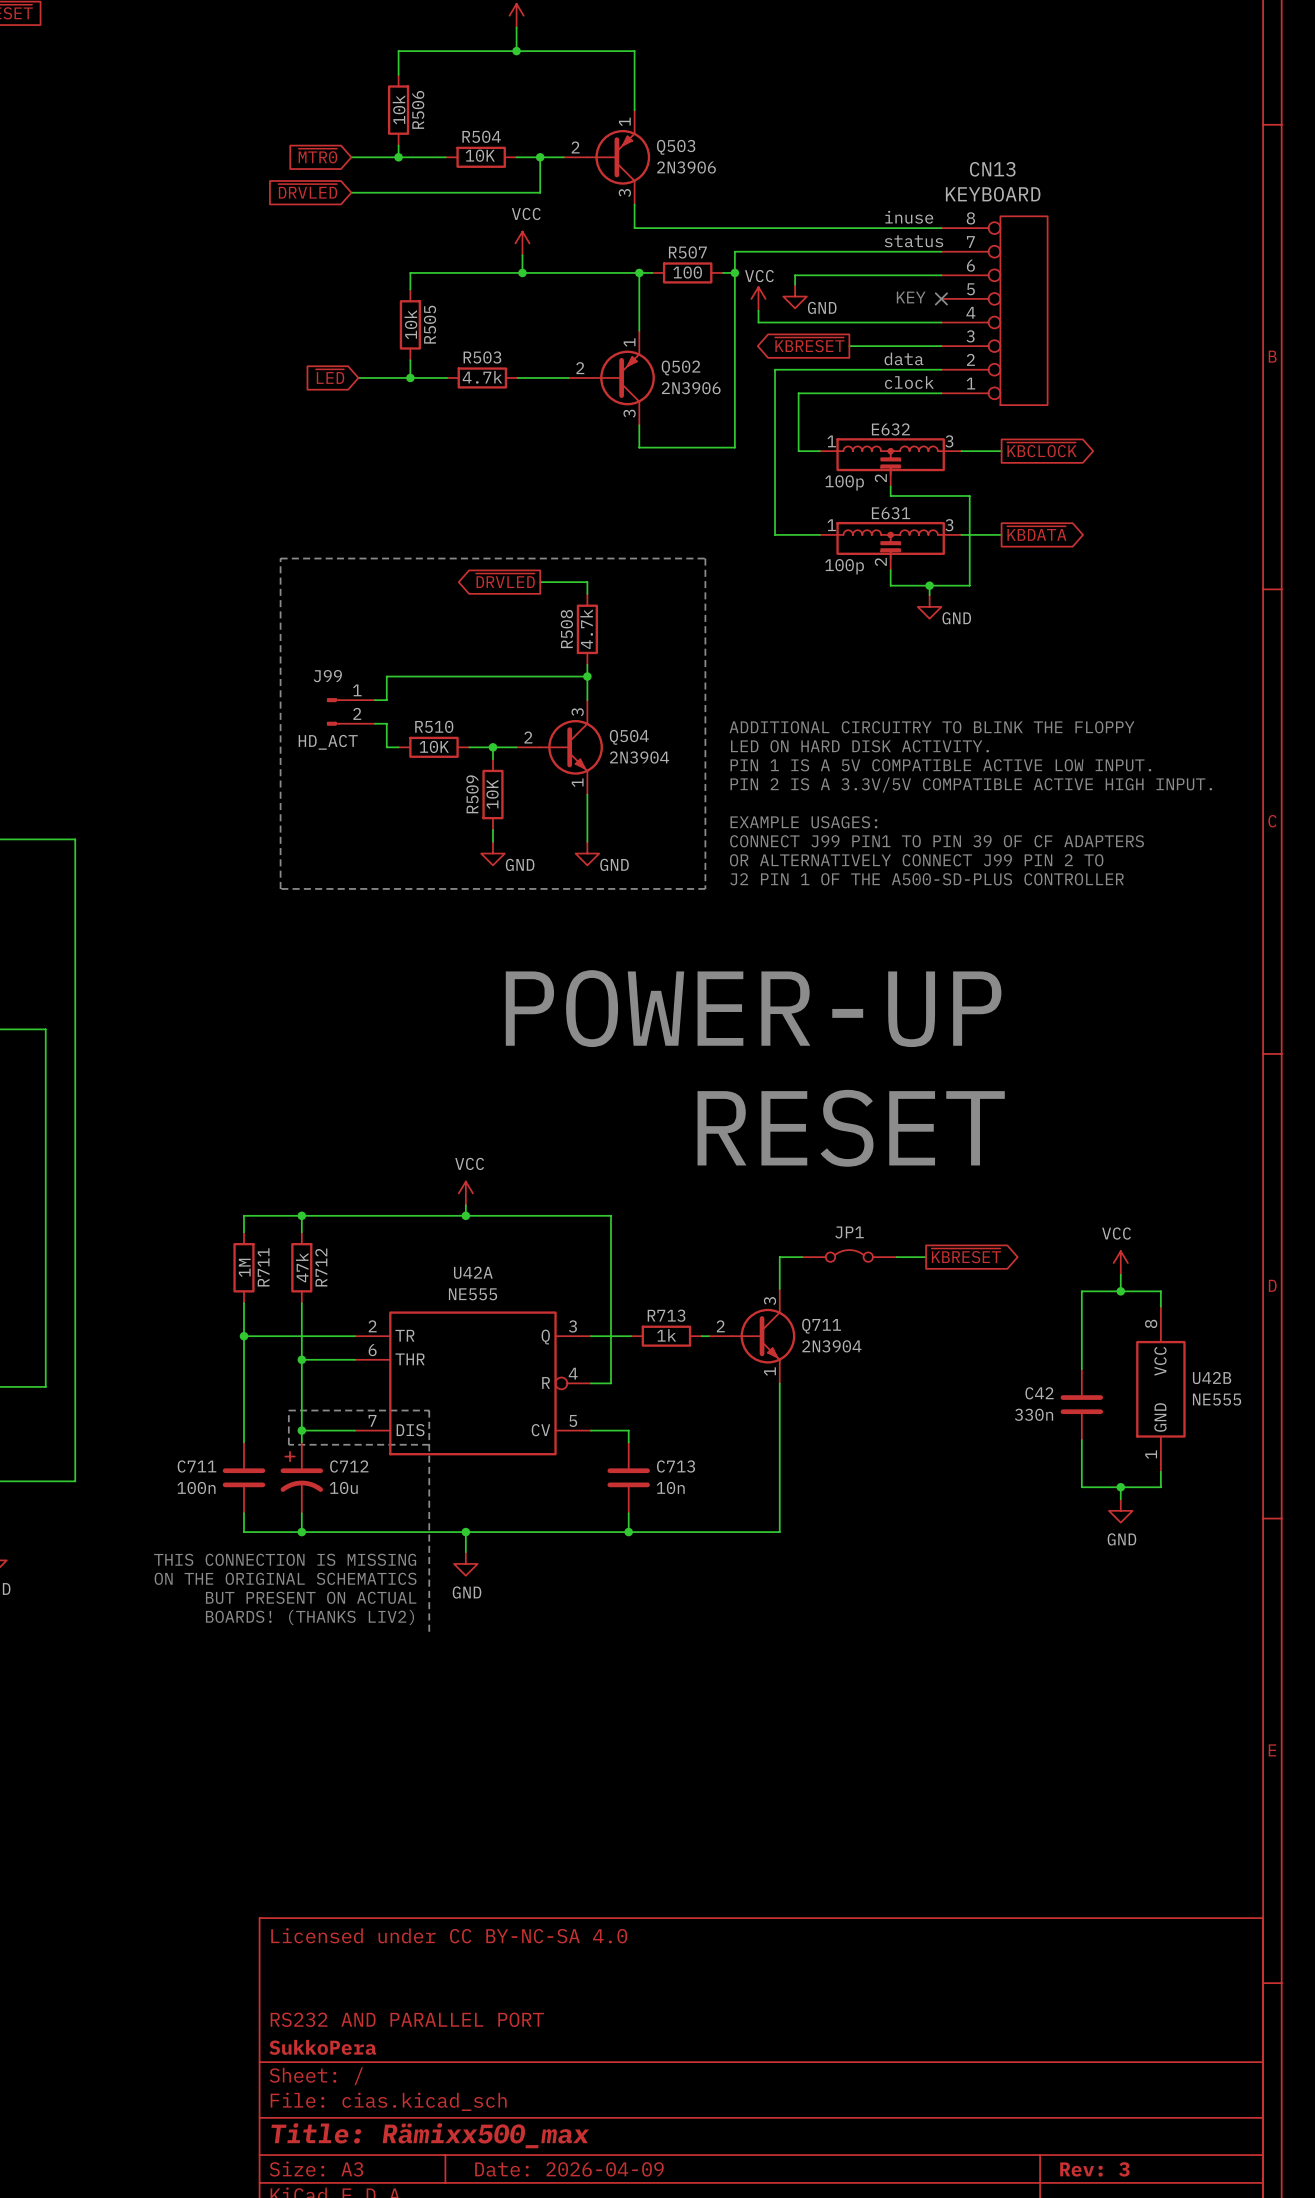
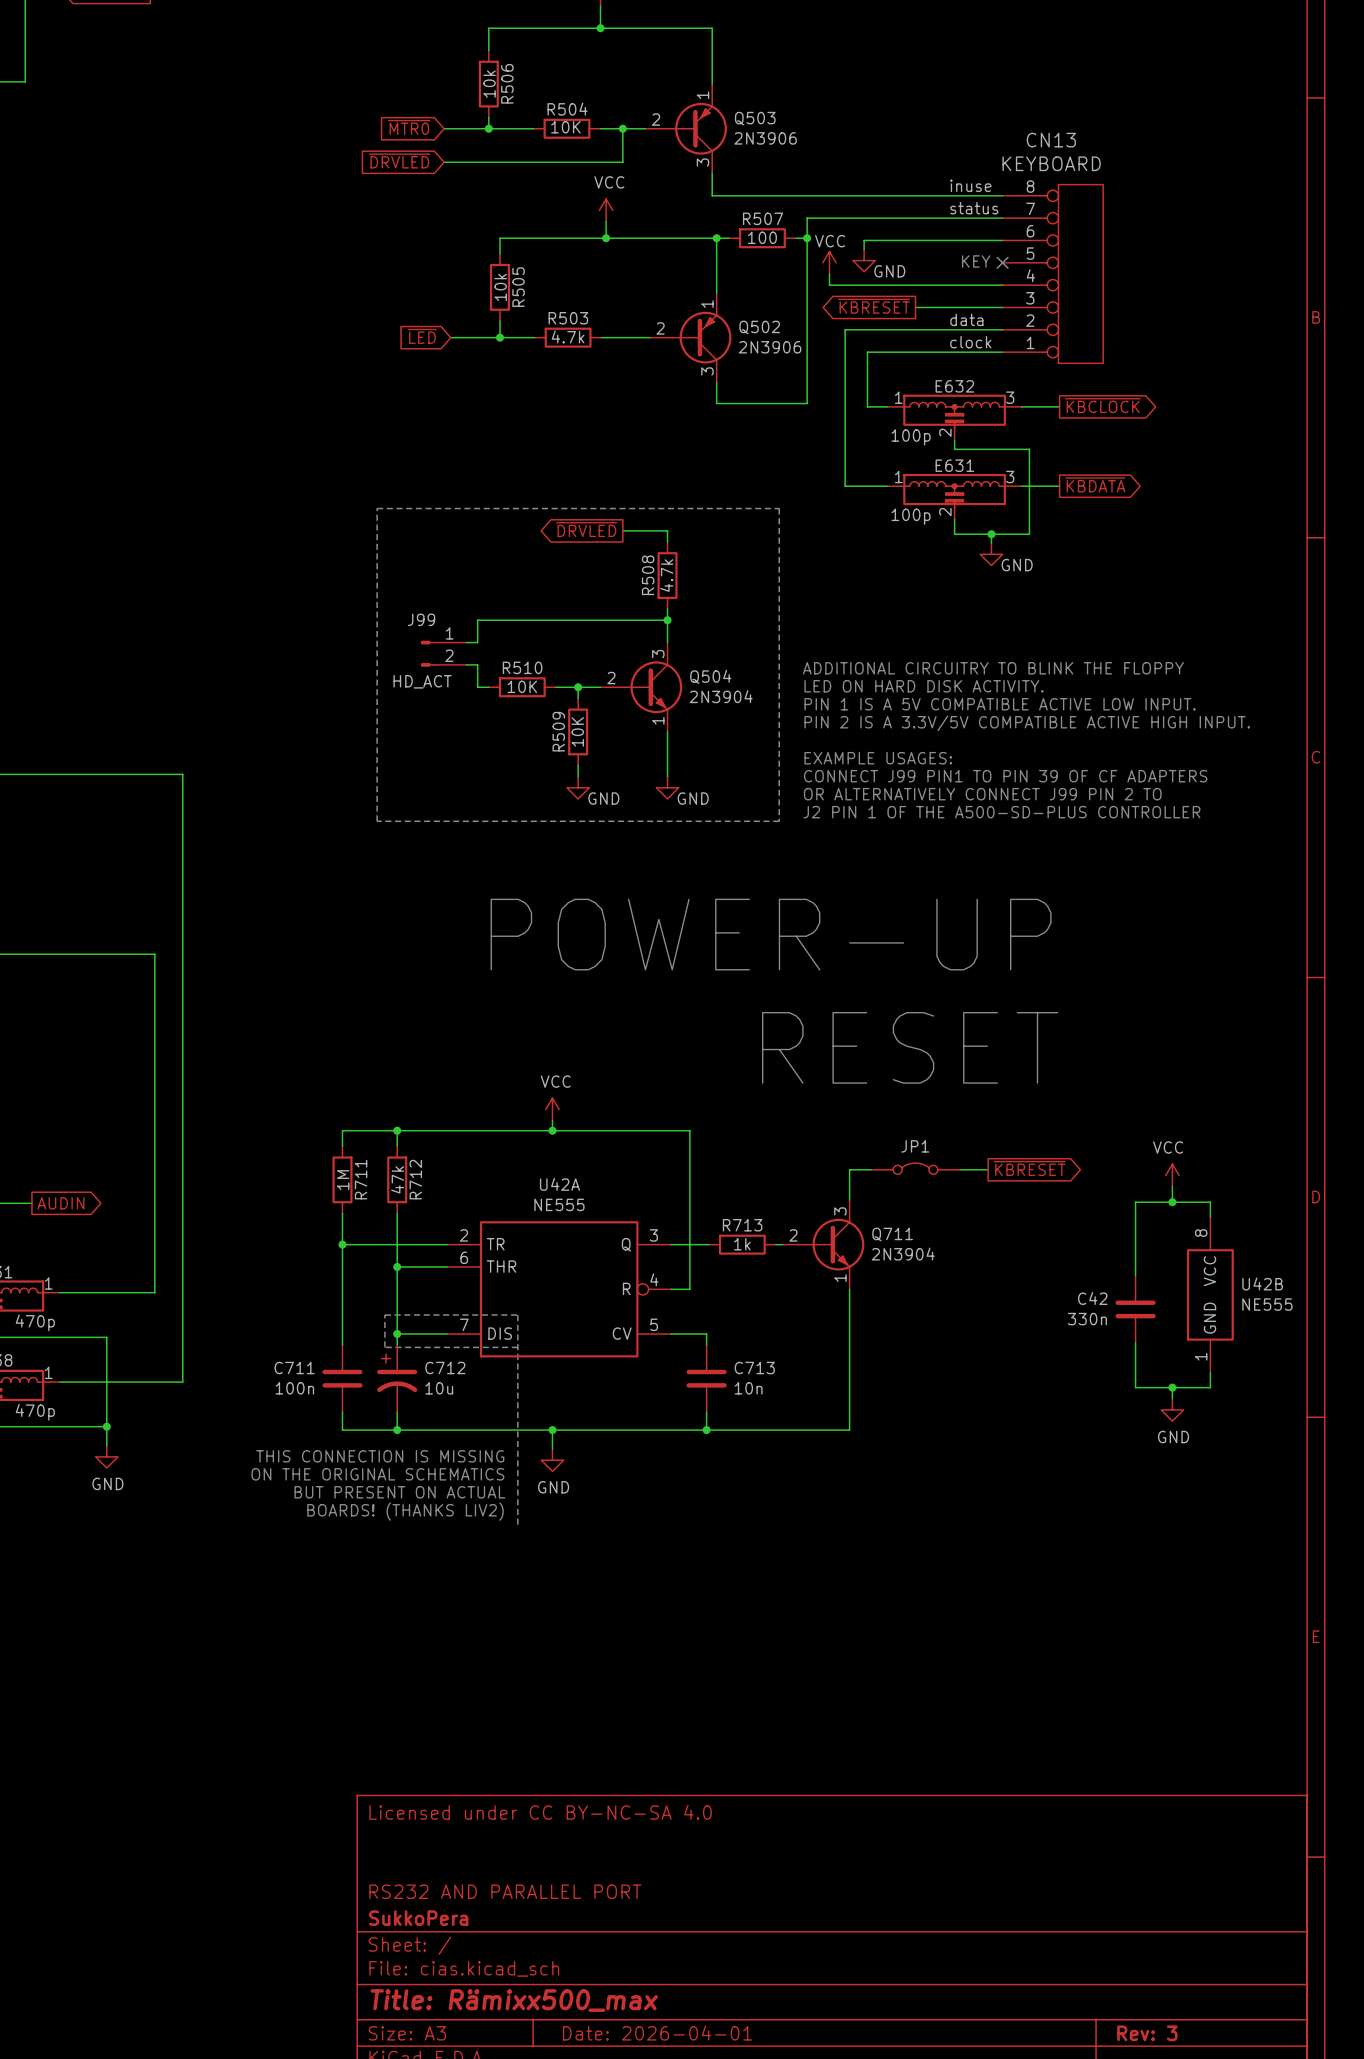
title block: Date: 2026-04-09 (569, 2169) -> Date: 2026-04-01 (657, 2033)

